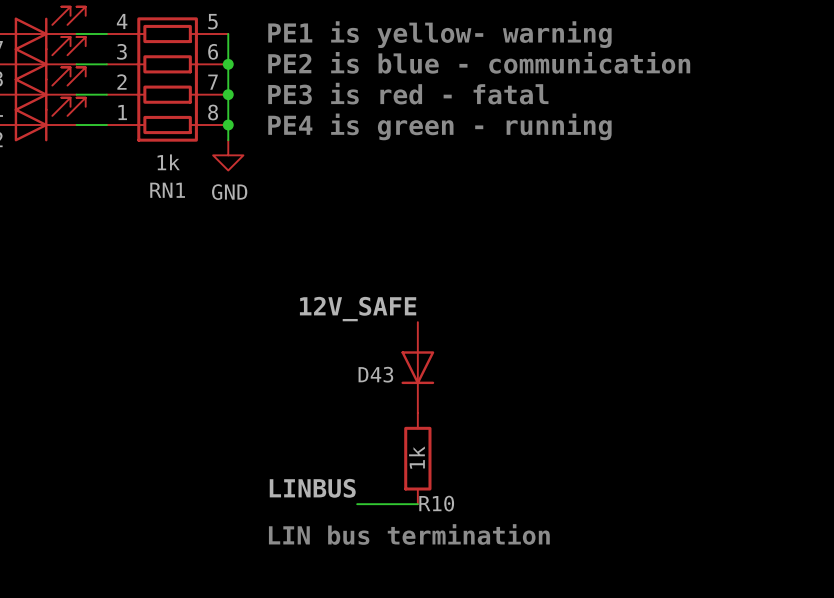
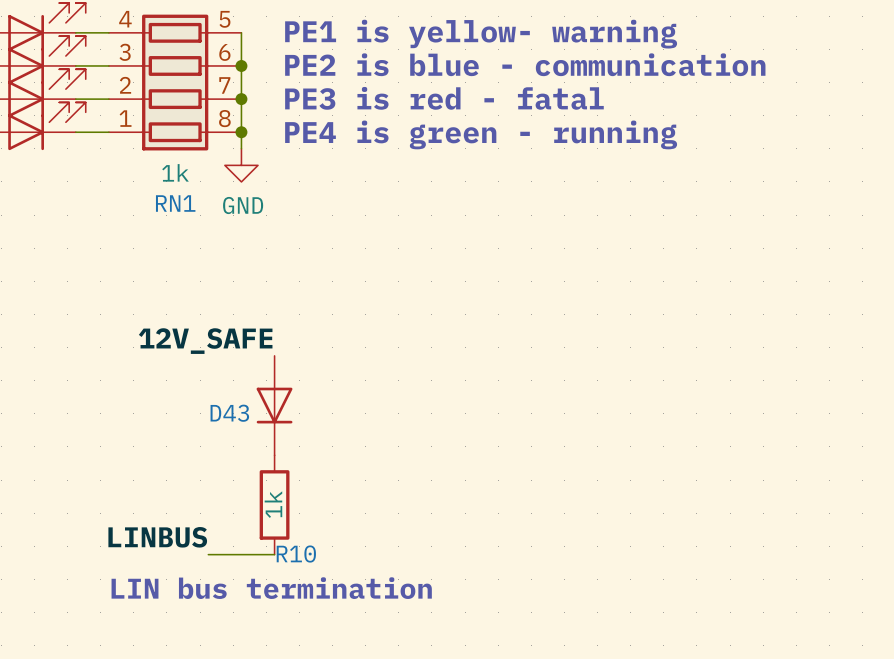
label position: 12V_SAFE (358, 309) -> 12V_SAFE (205, 341)
D43 position: (417, 367) -> (274, 405)
R10 position: (417, 458) -> (274, 504)
label position: LINBUS (312, 488) -> LINBUS (157, 537)
wire: (357, 504) (417, 504) -> (208, 554) (274, 554)
text position: LIN bus termination (409, 534) -> LIN bus termination (271, 588)

